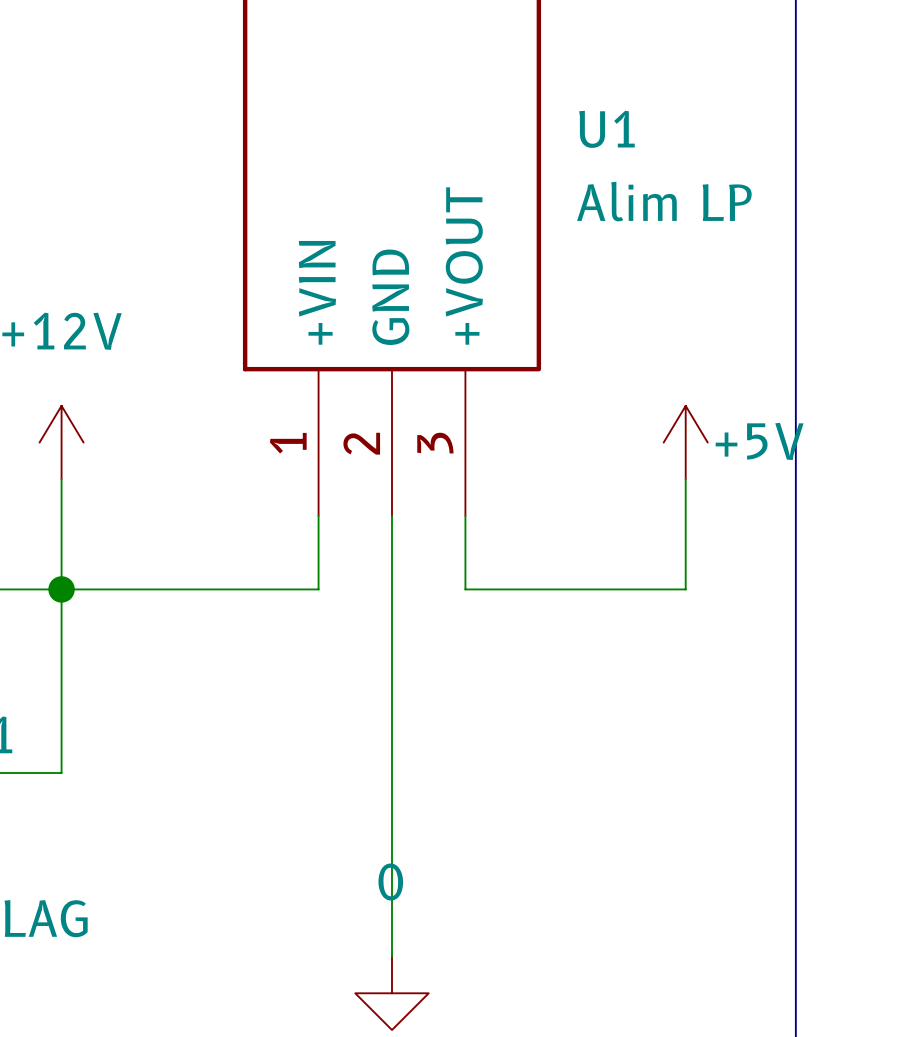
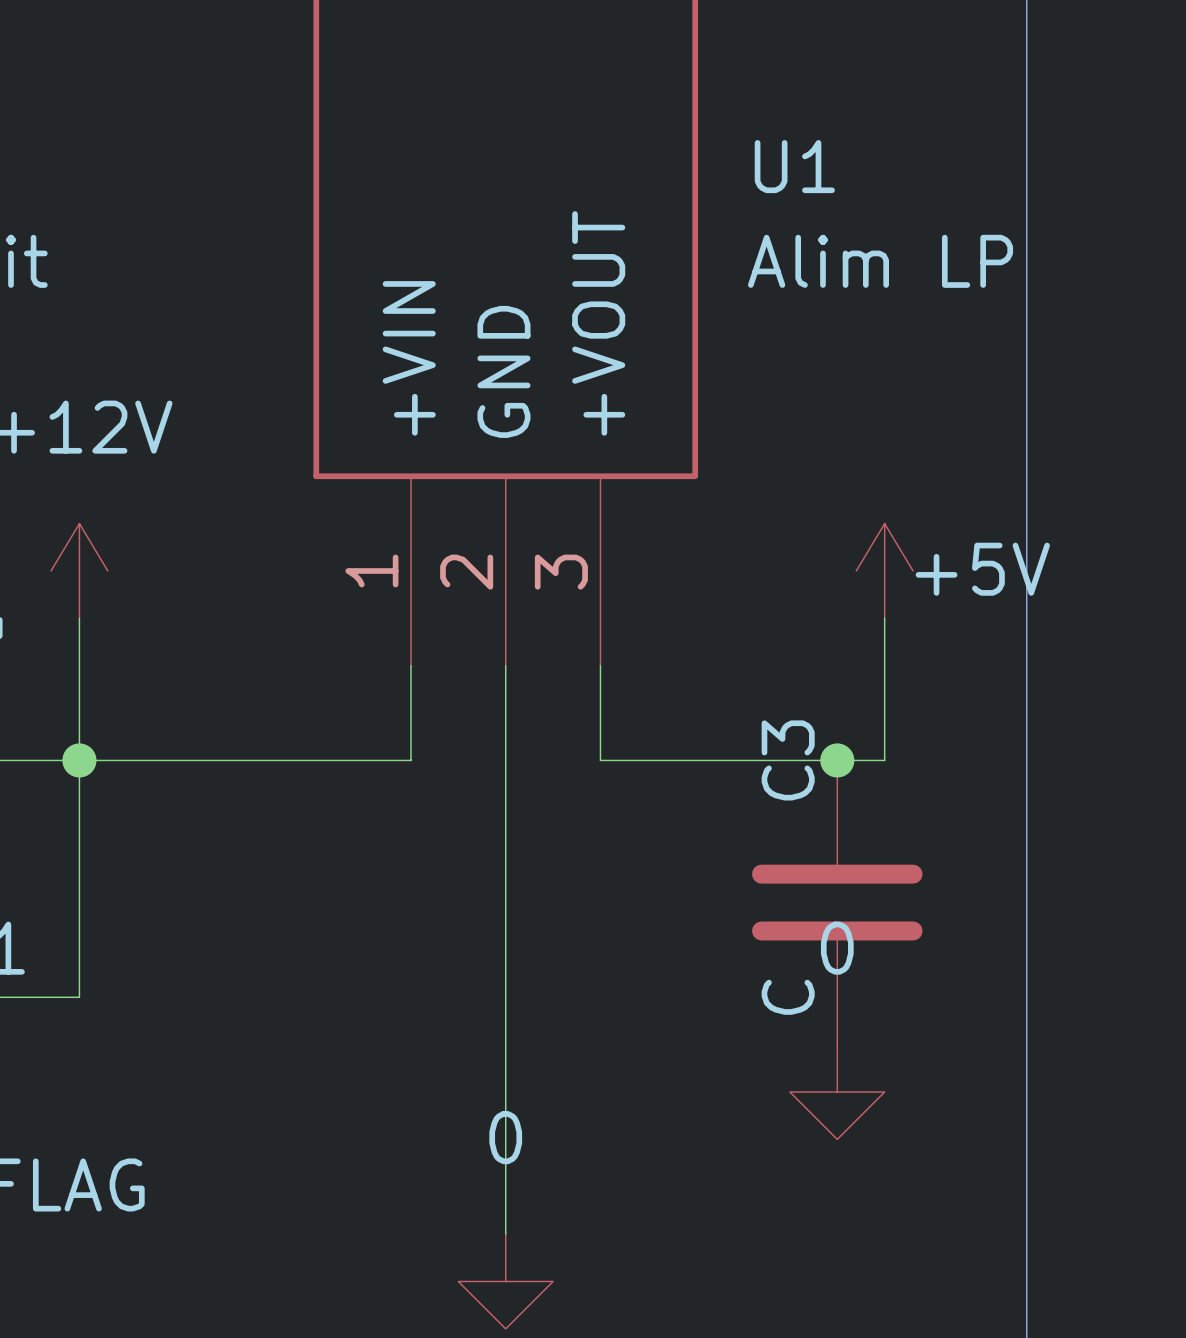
junction: none -> (837, 760)
C3: none -> C (837, 902)
power symbol: none -> 0 (837, 1092)

